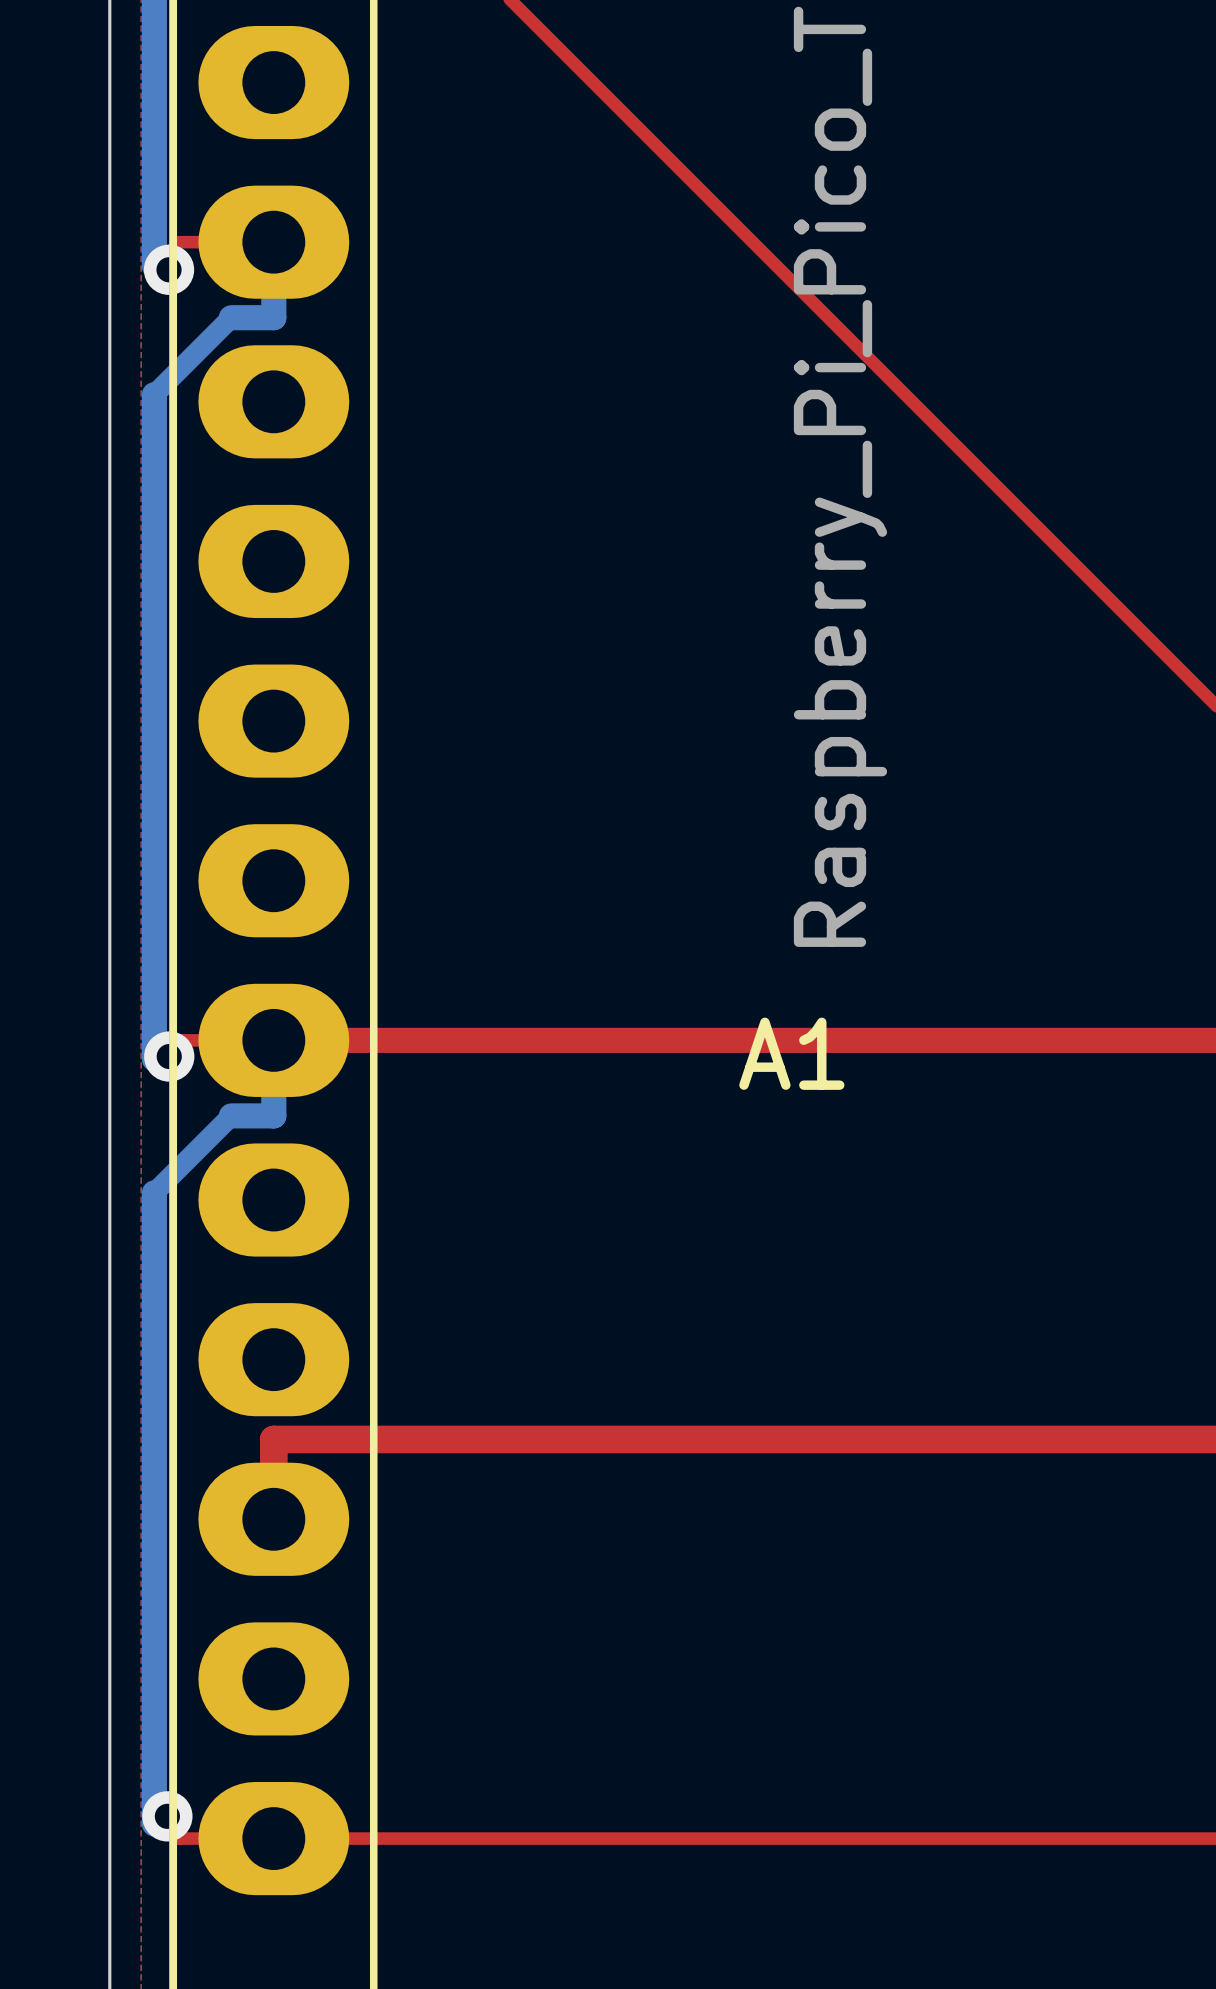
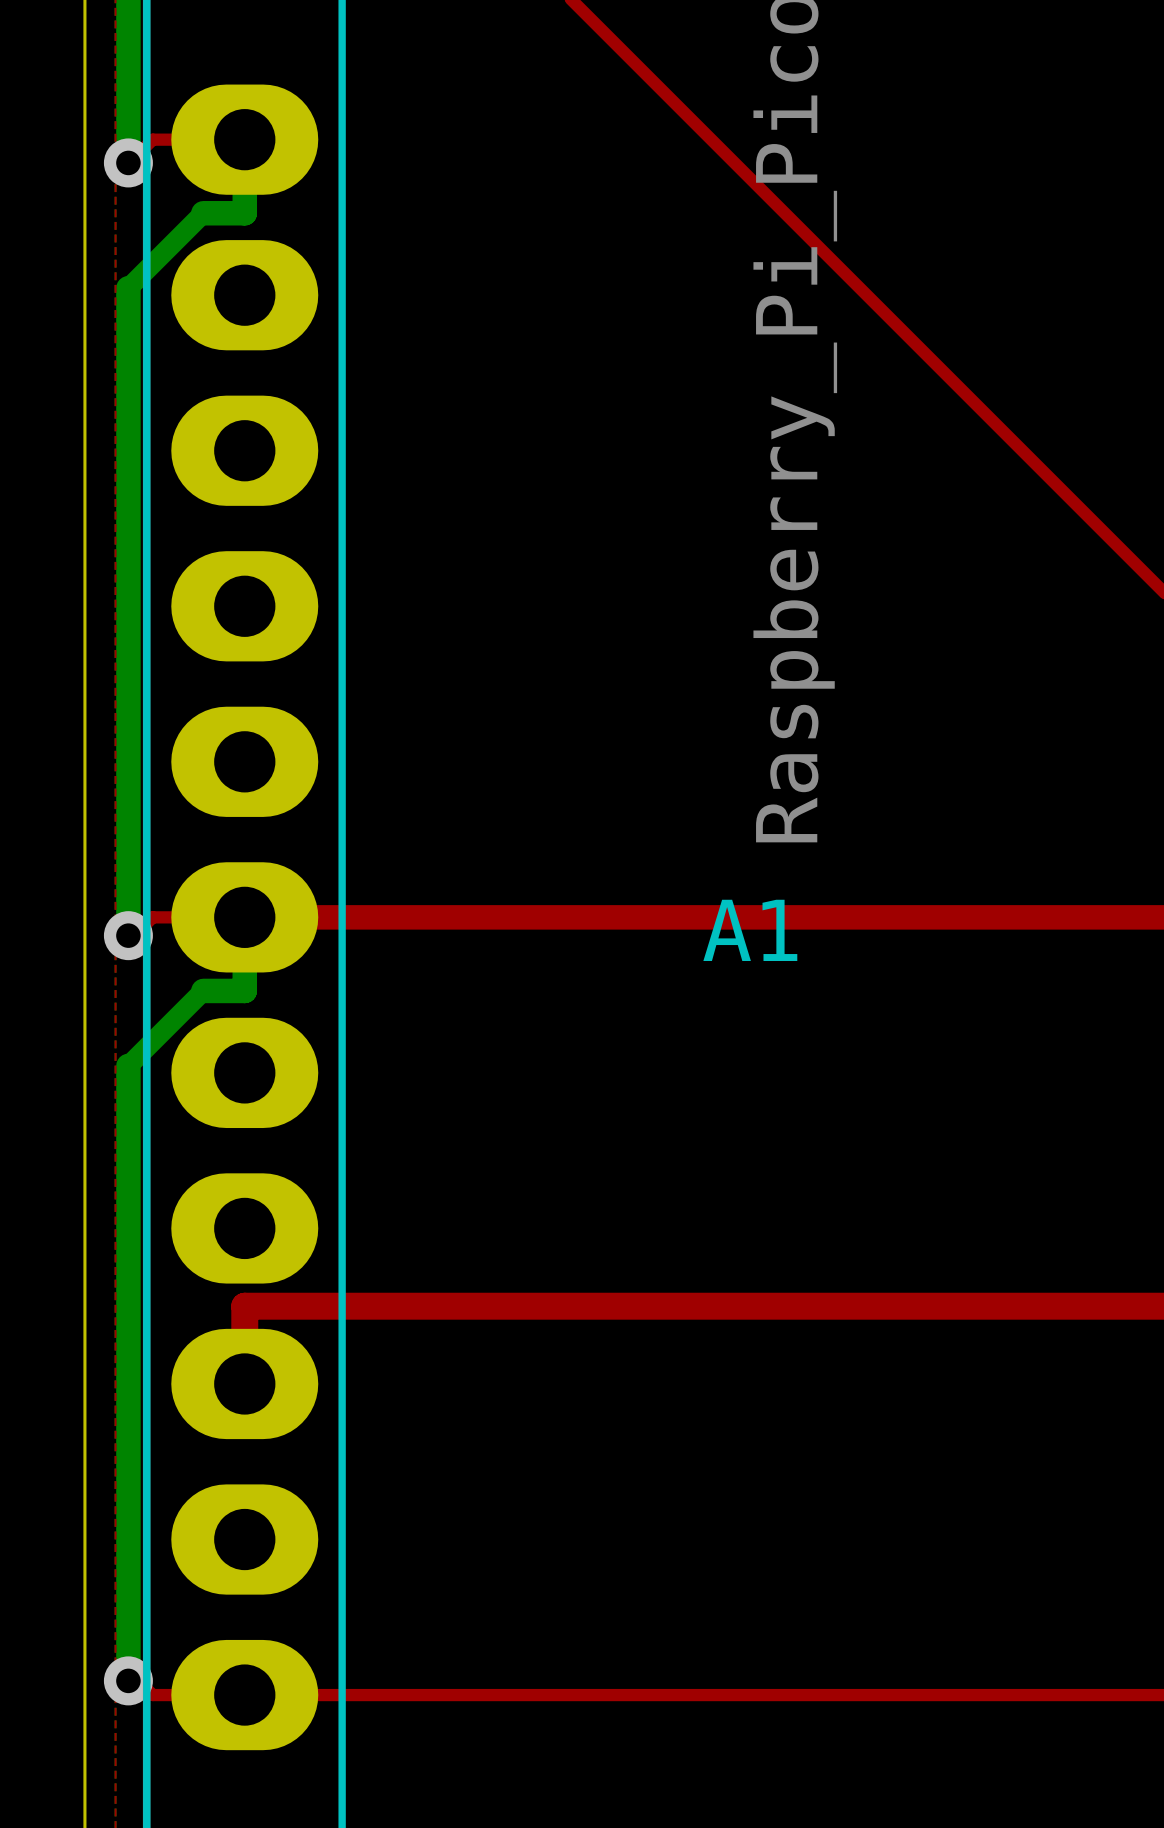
via position: (169, 269) -> (128, 162)
via position: (169, 1056) -> (128, 935)
via position: (167, 1816) -> (128, 1680)

